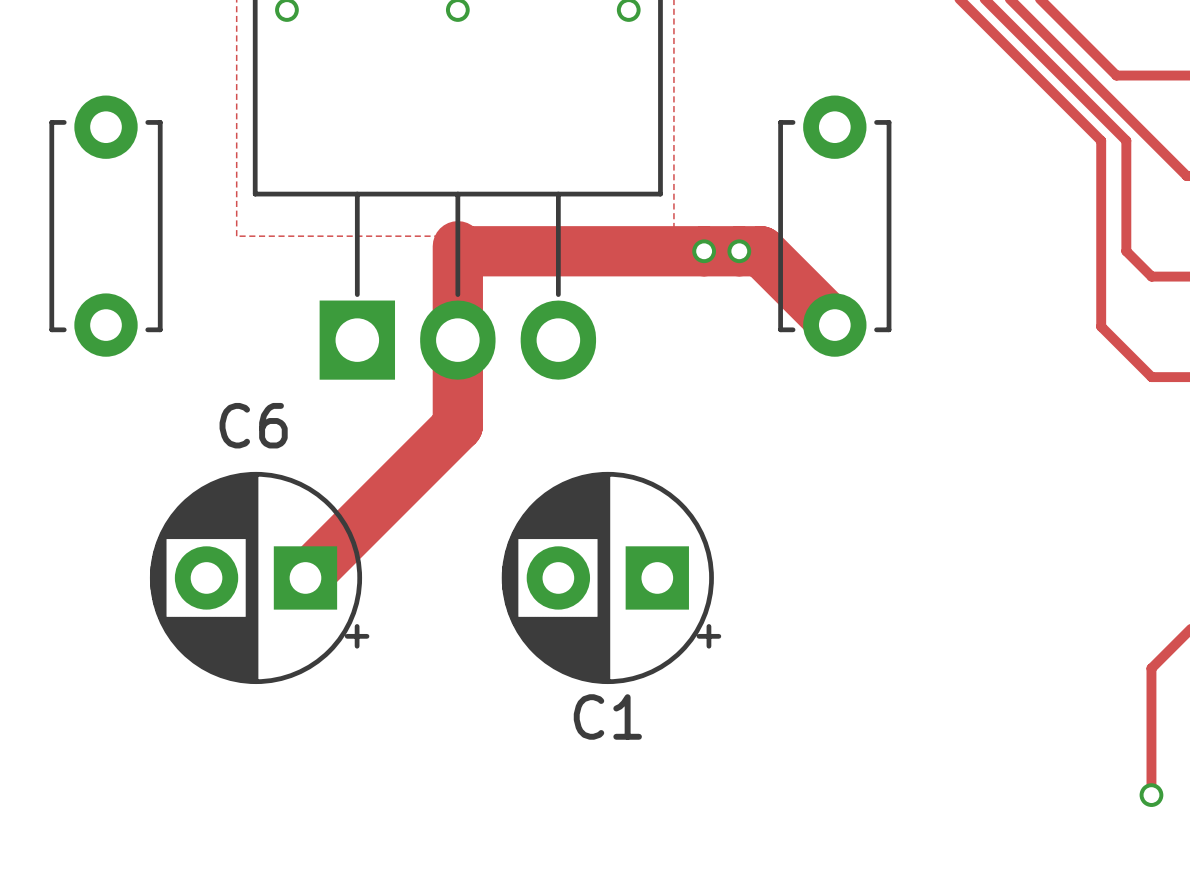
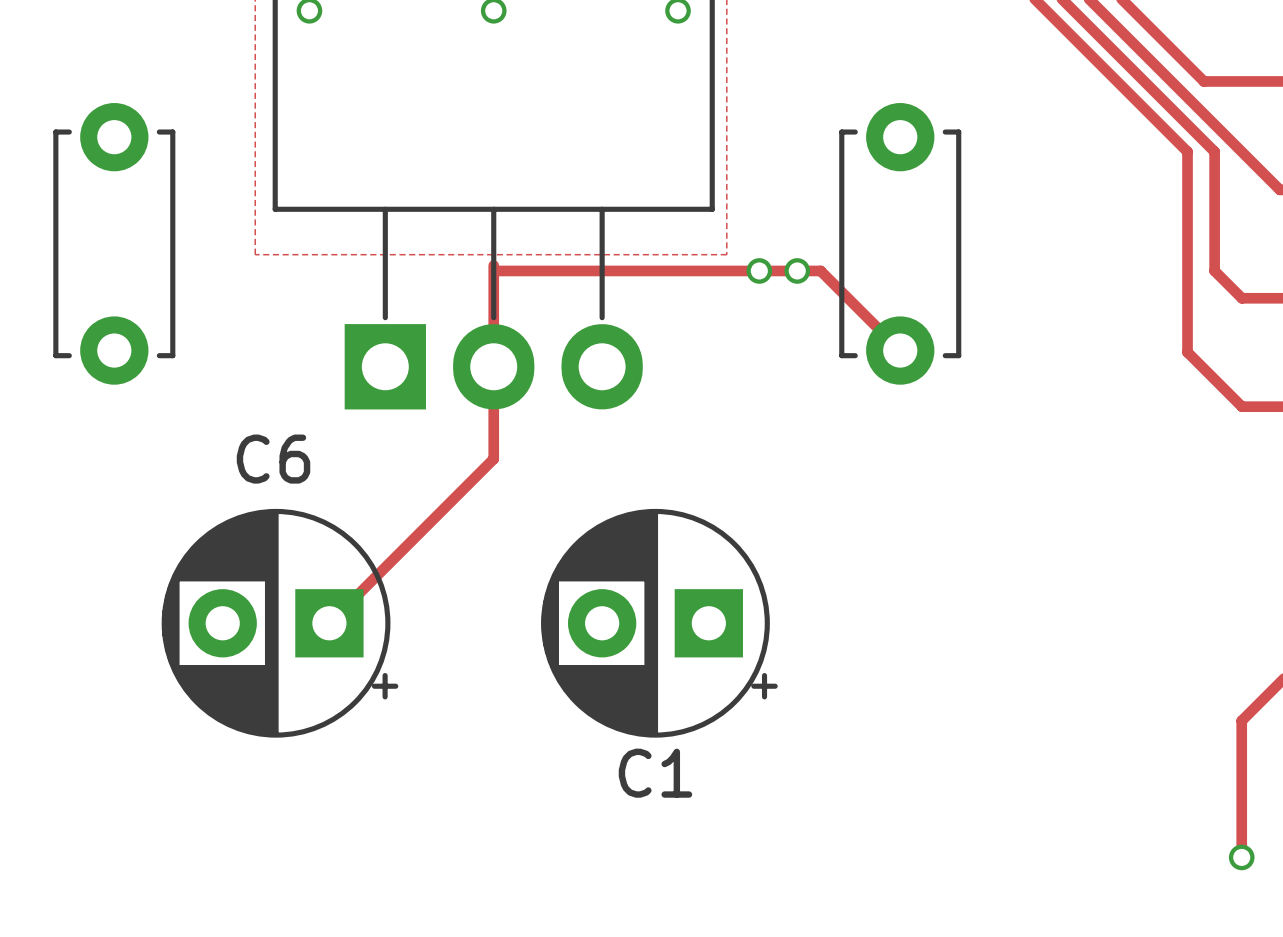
track width: thick (457, 246) (457, 425) (305, 577) -> thin (493, 265) (493, 458) (329, 623)
track width: thick (462, 251) (761, 251) (834, 325) -> thin (499, 270) (820, 270) (900, 350)

